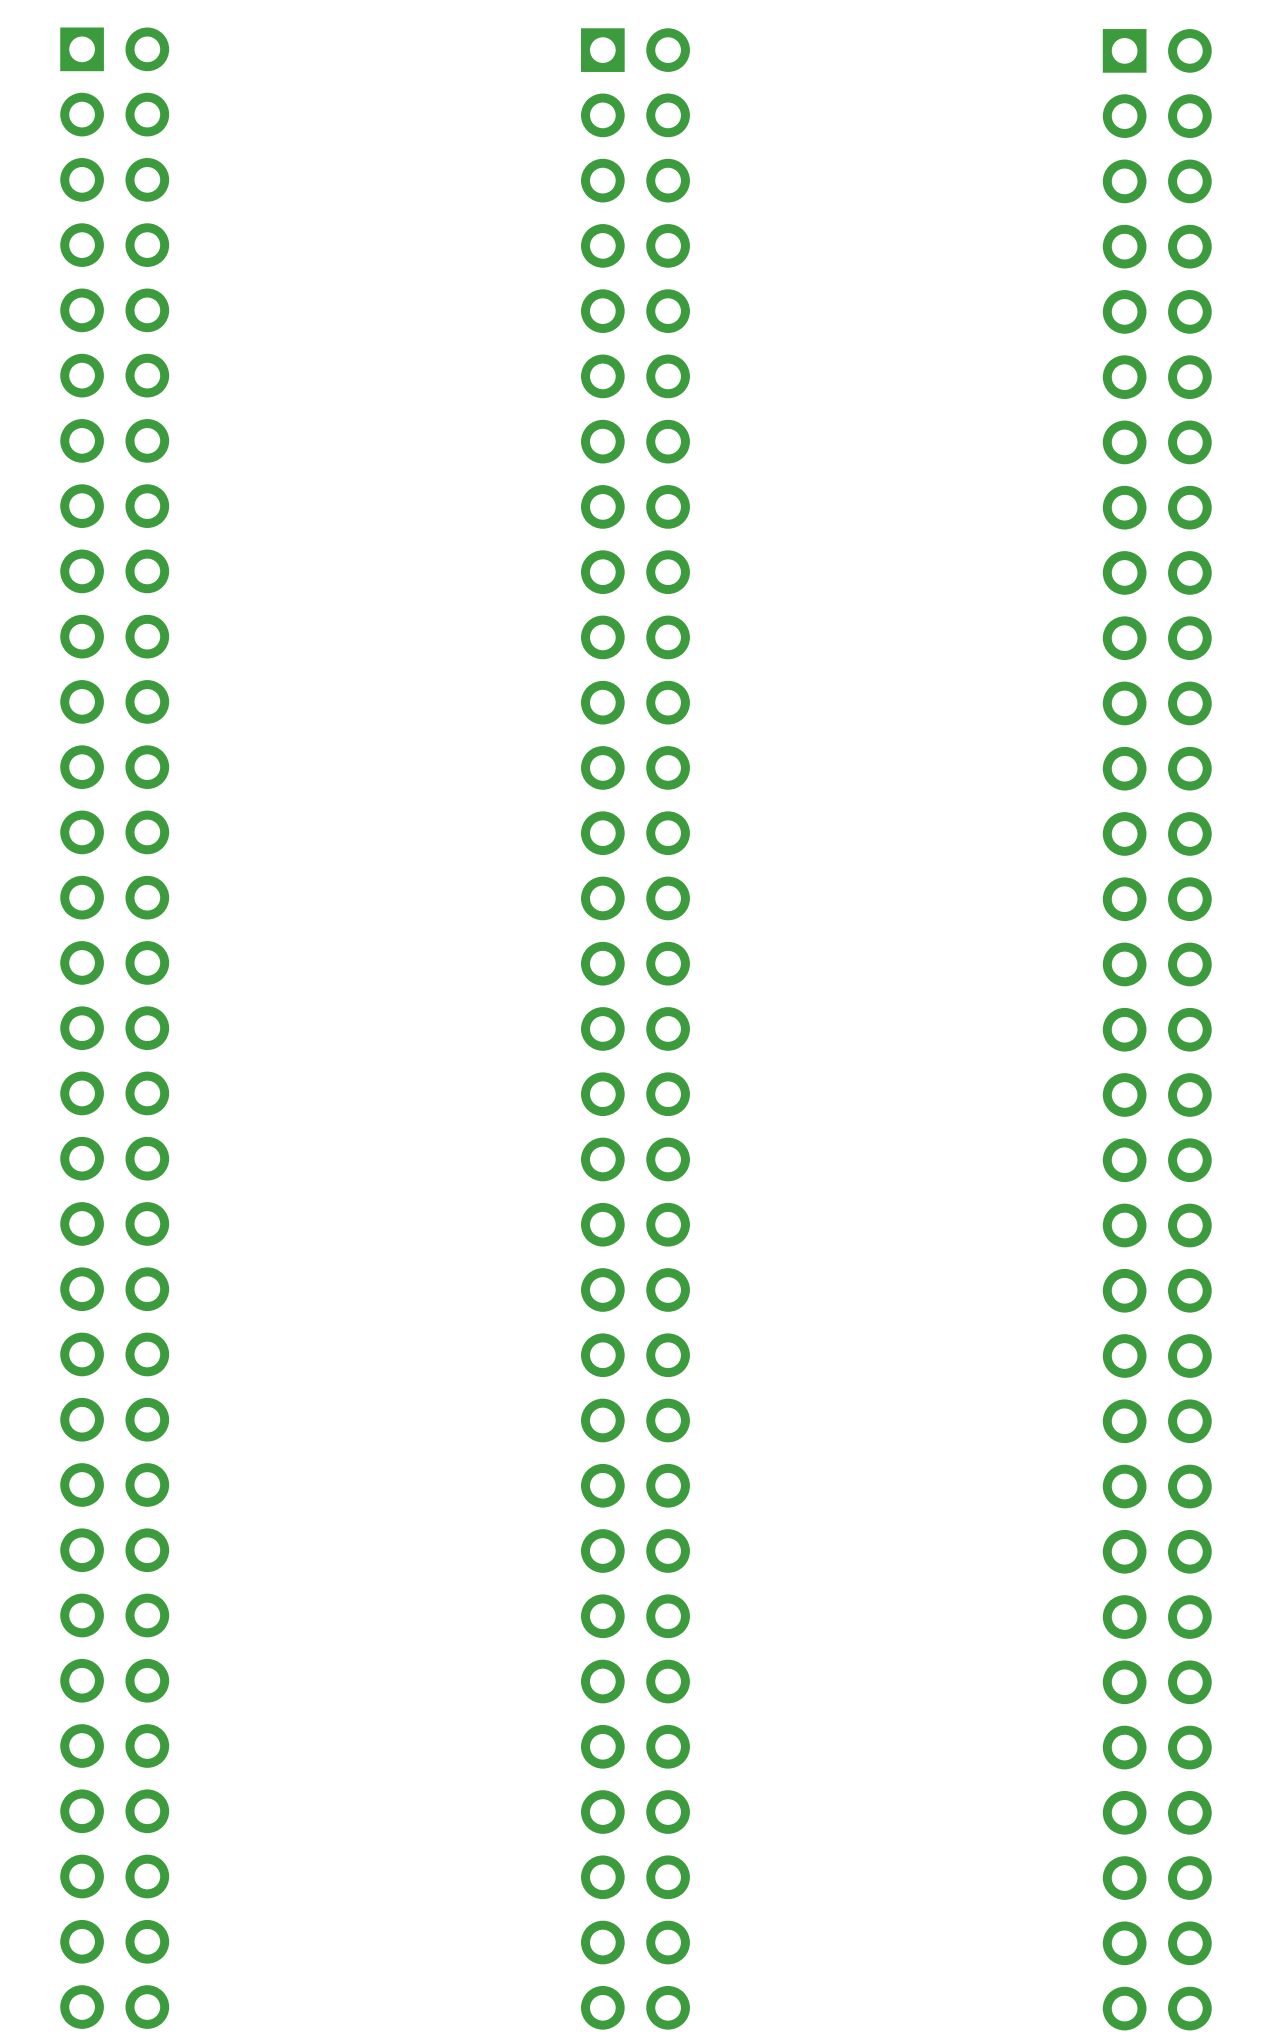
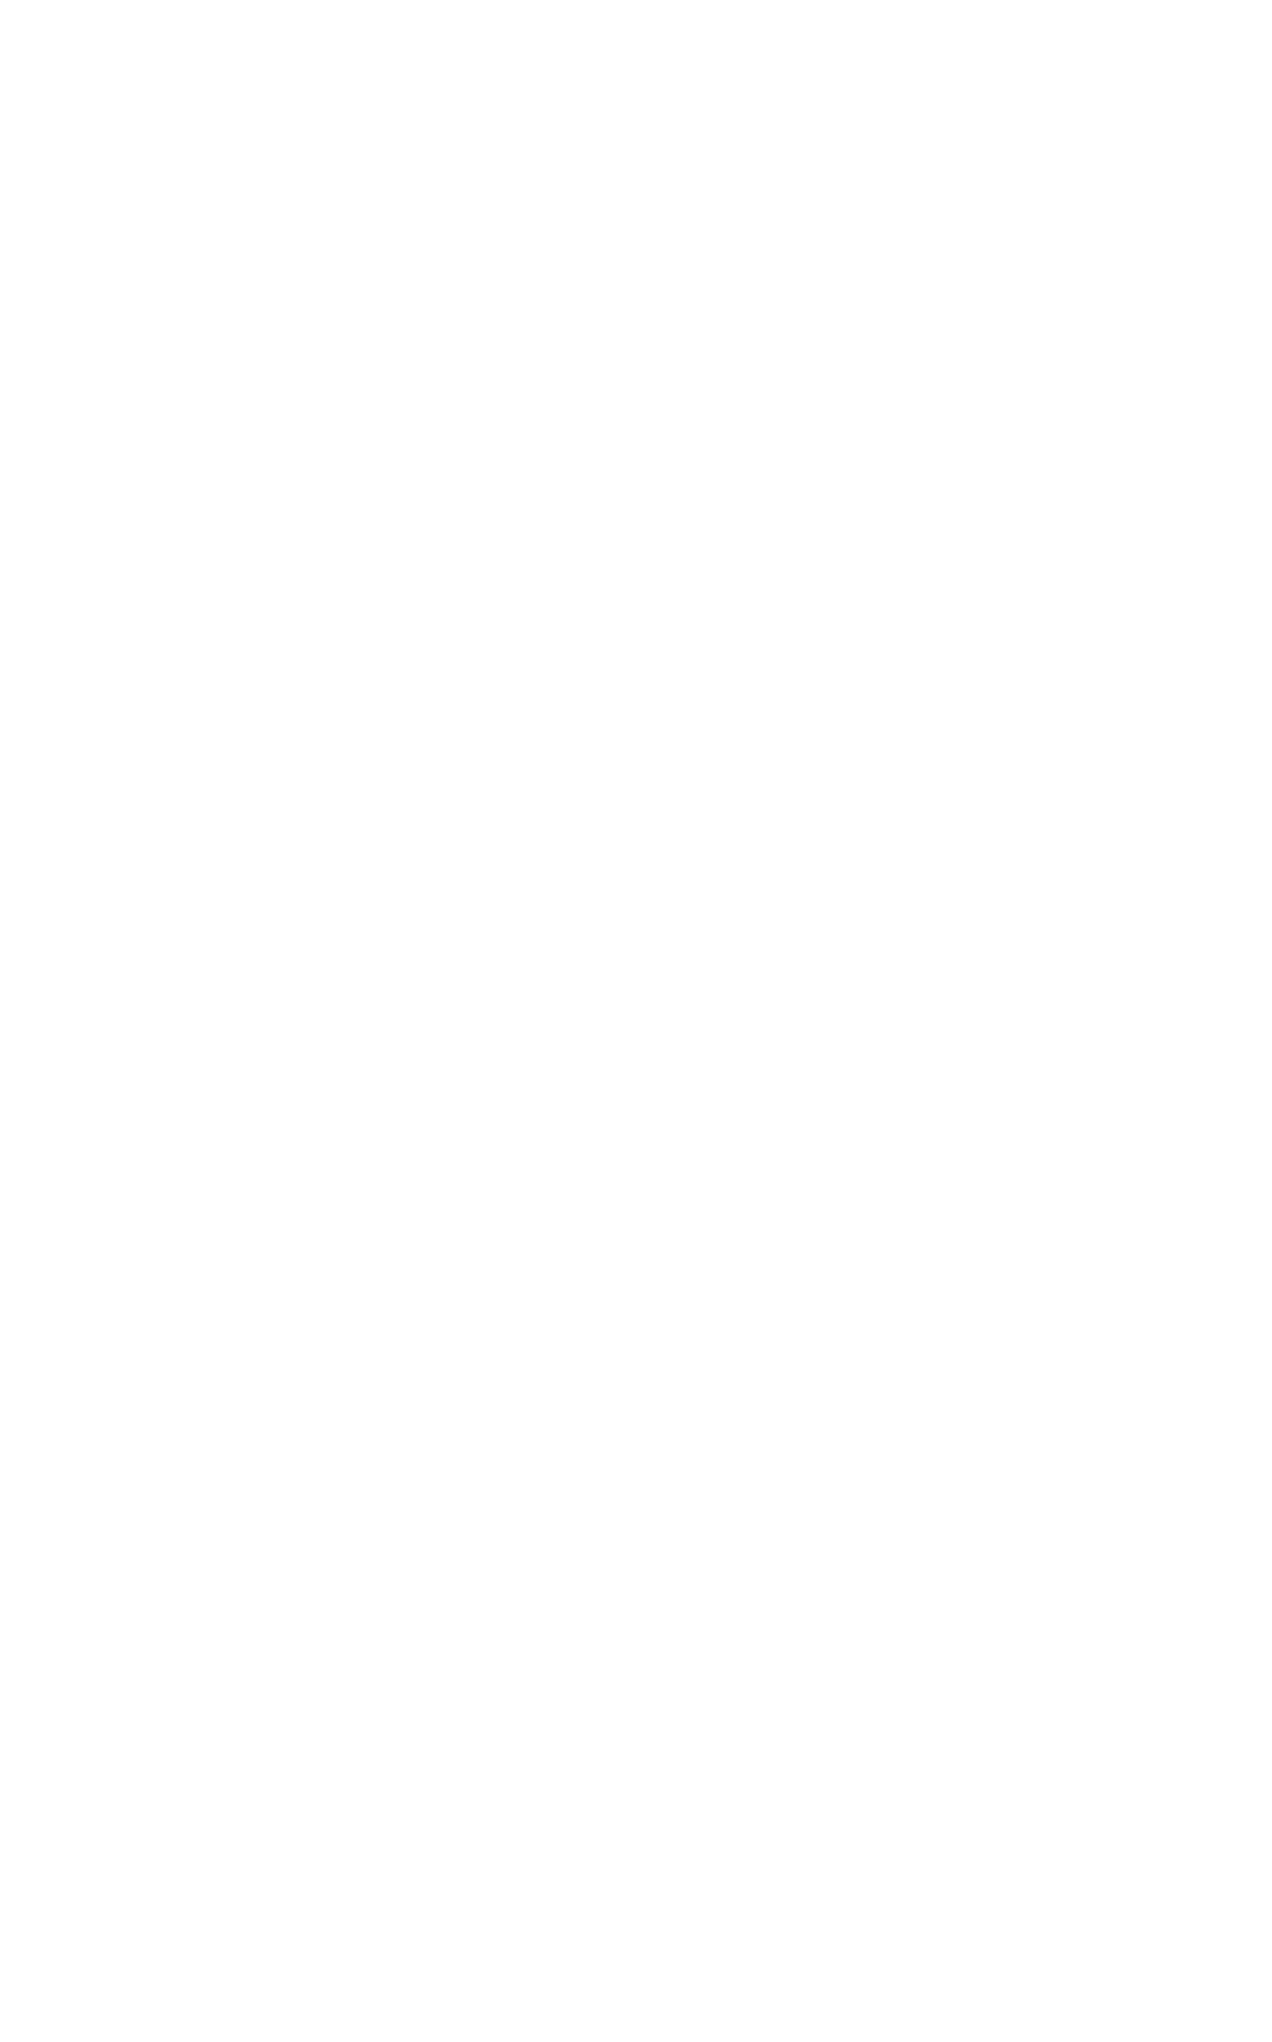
part: (114, 1028) -> none
part: (635, 1028) -> none
part: (1157, 1029) -> none

